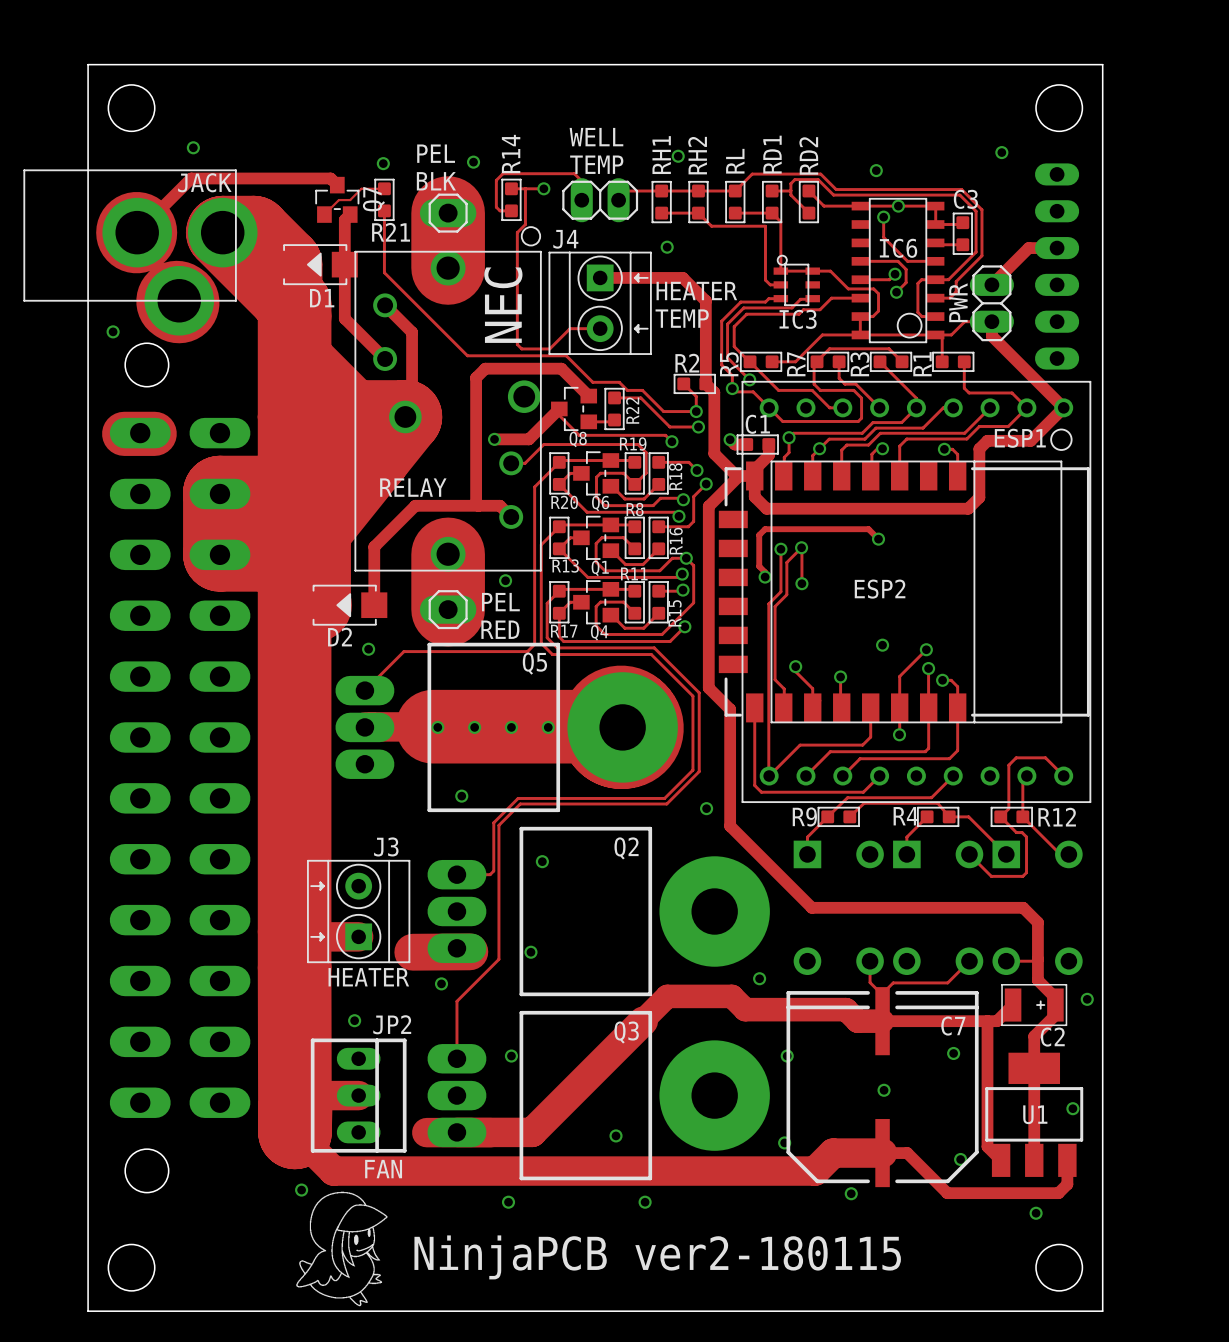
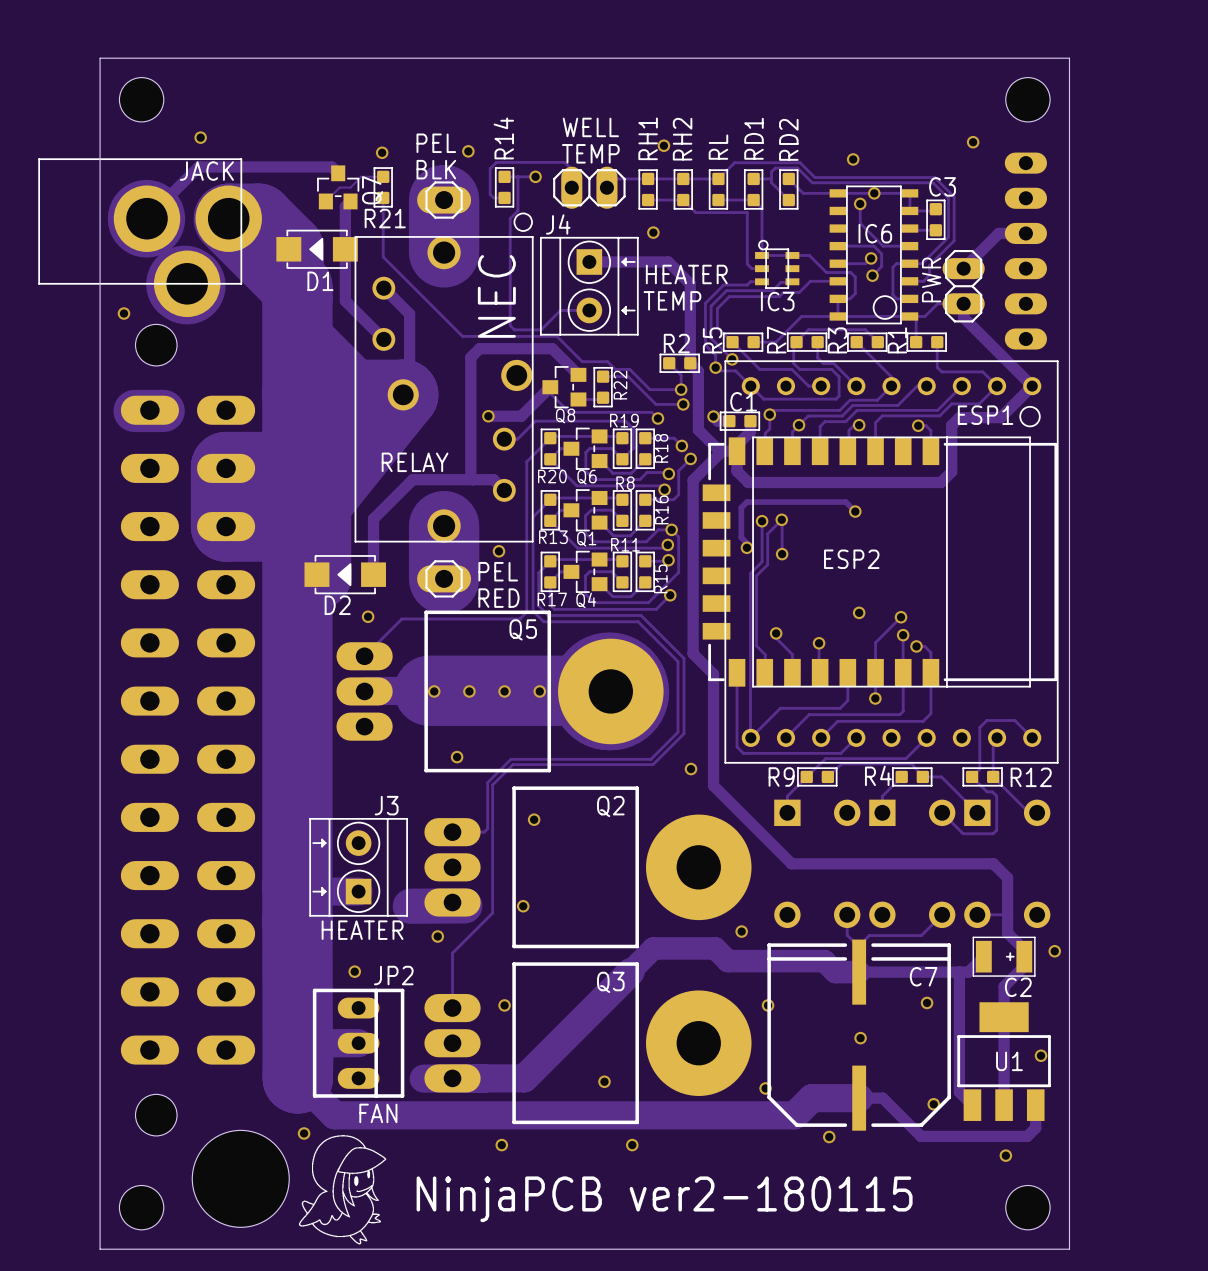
hole: none -> (240, 1178)

